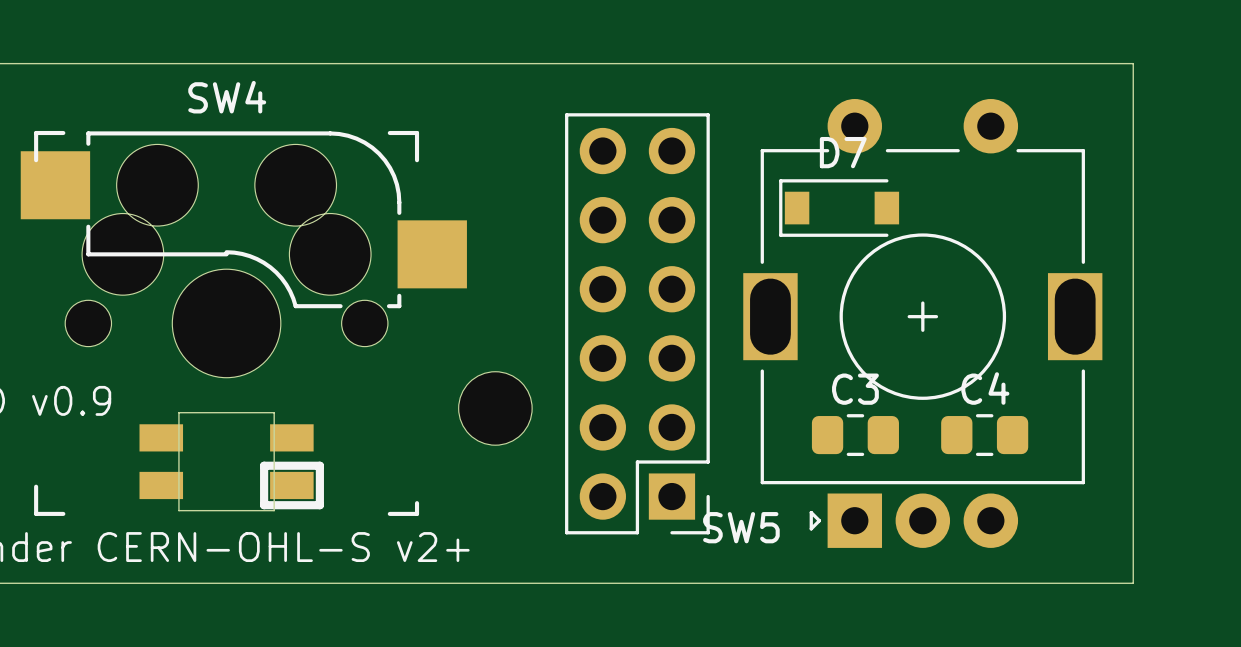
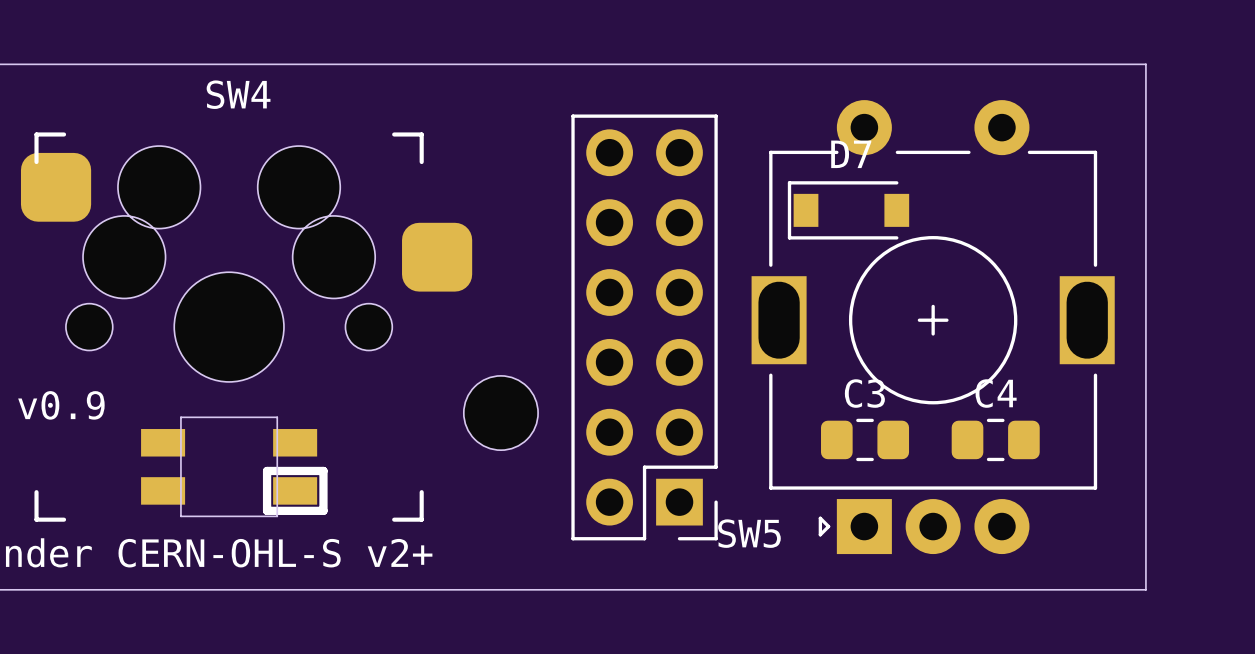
SW4 footprint: [20, 130, 467, 516] -> [20, 132, 473, 522]

